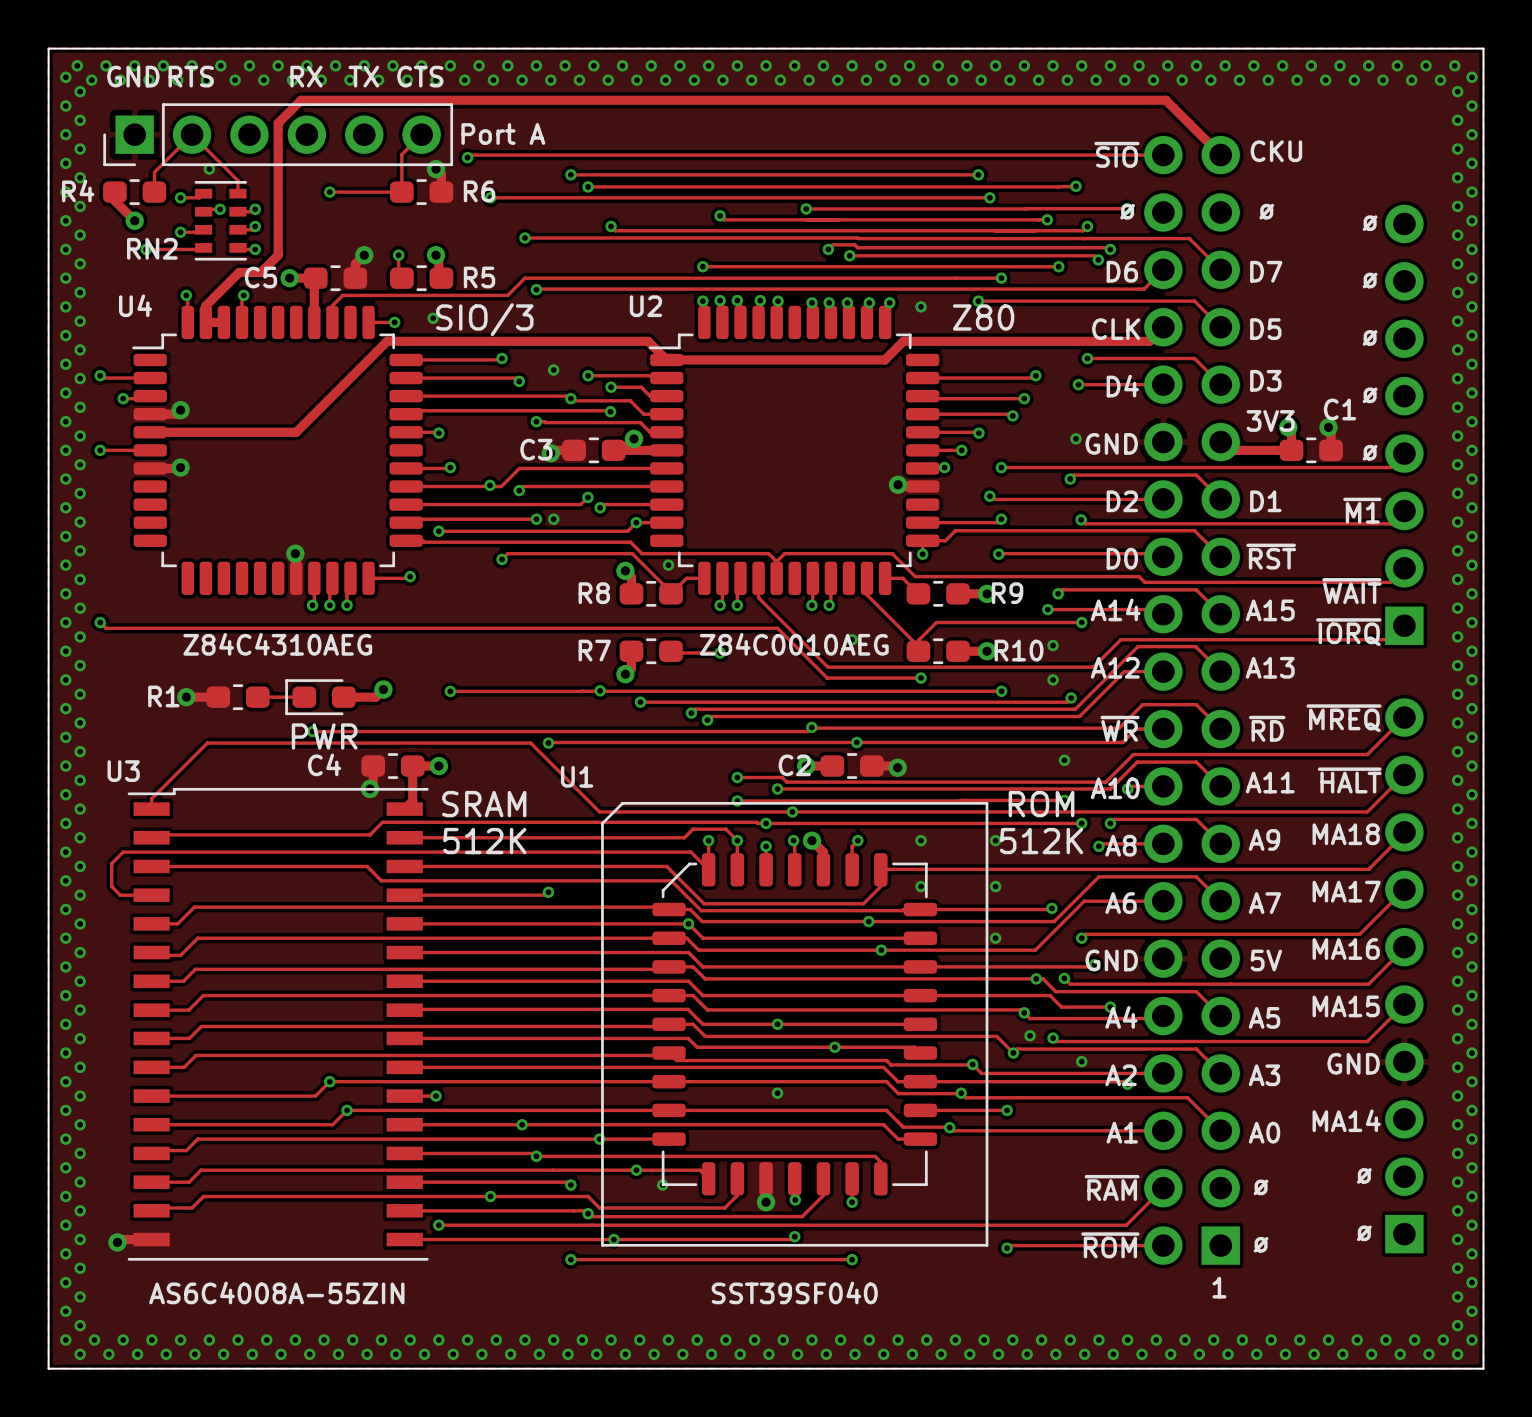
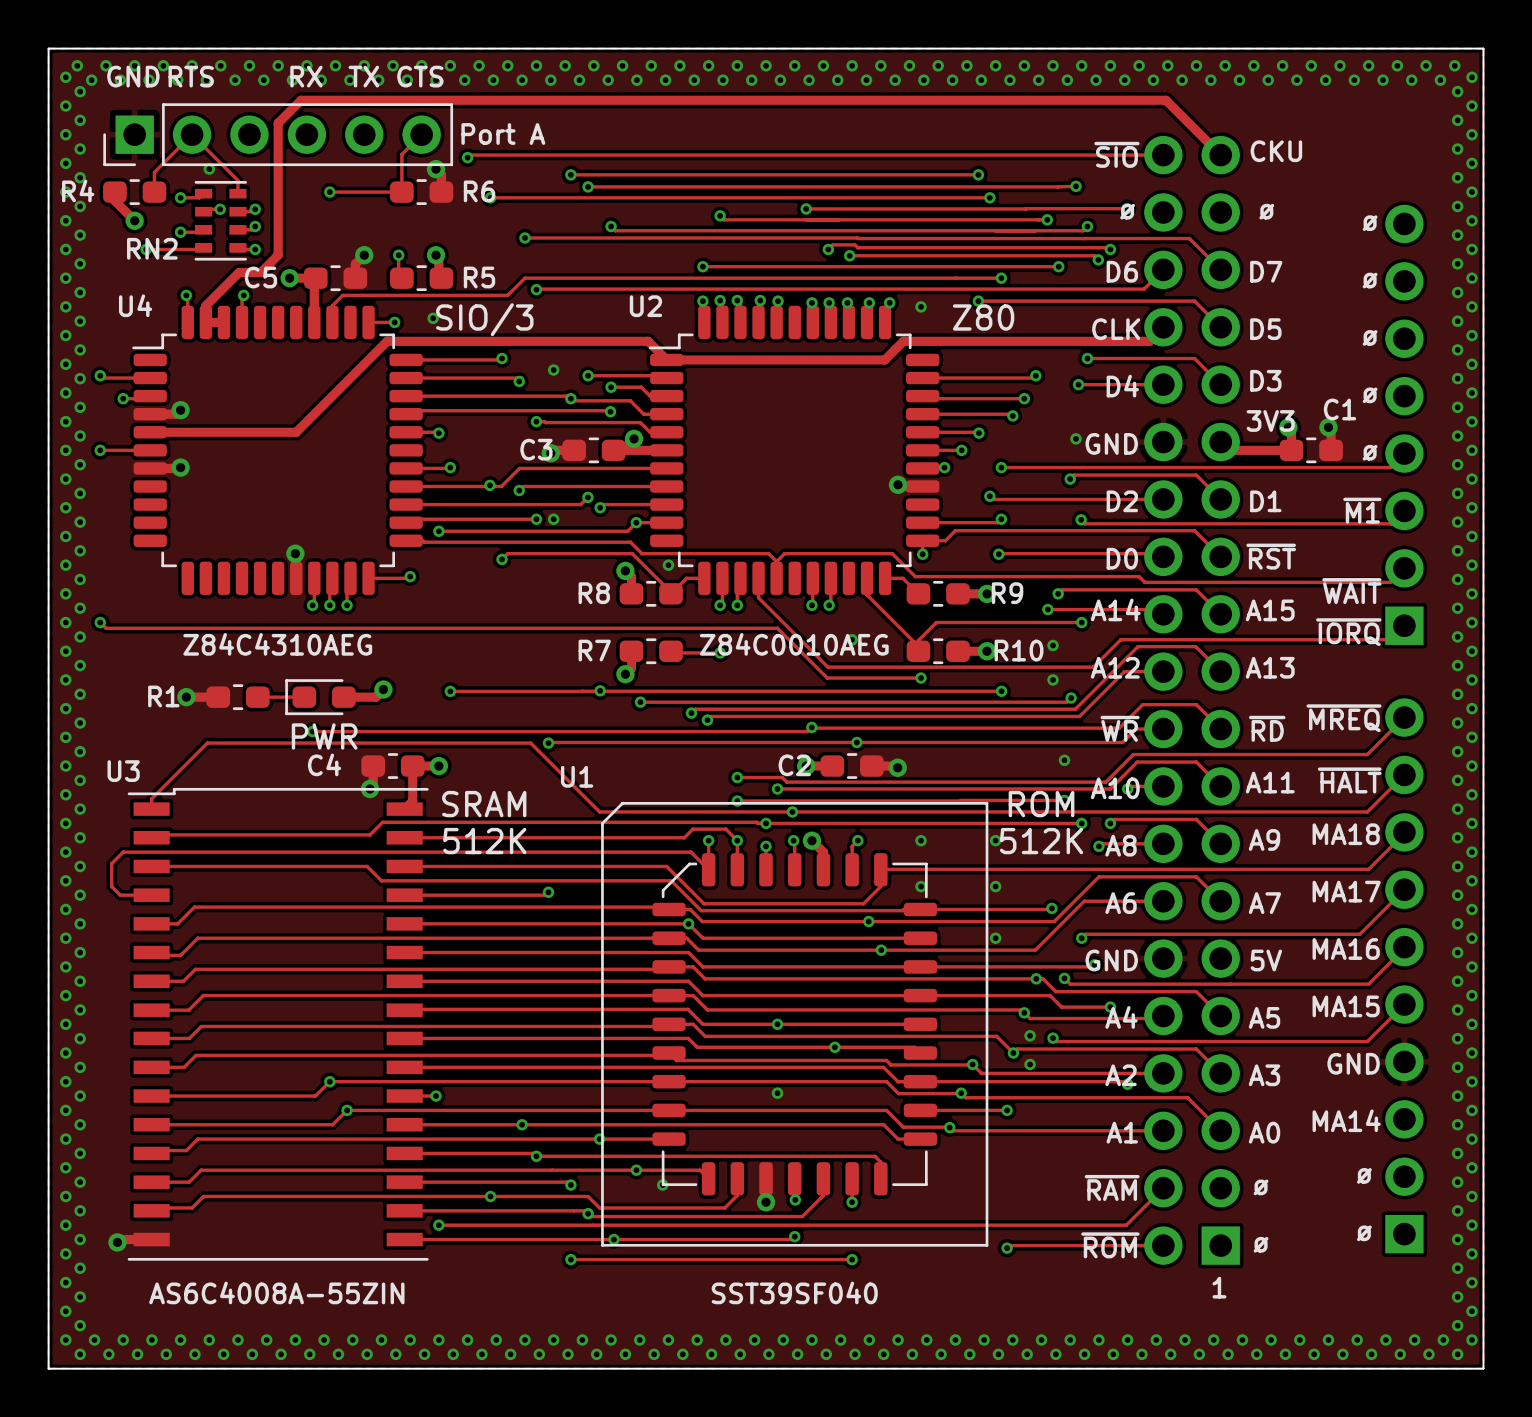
via position: (1081, 1061) -> (1030, 1064)

